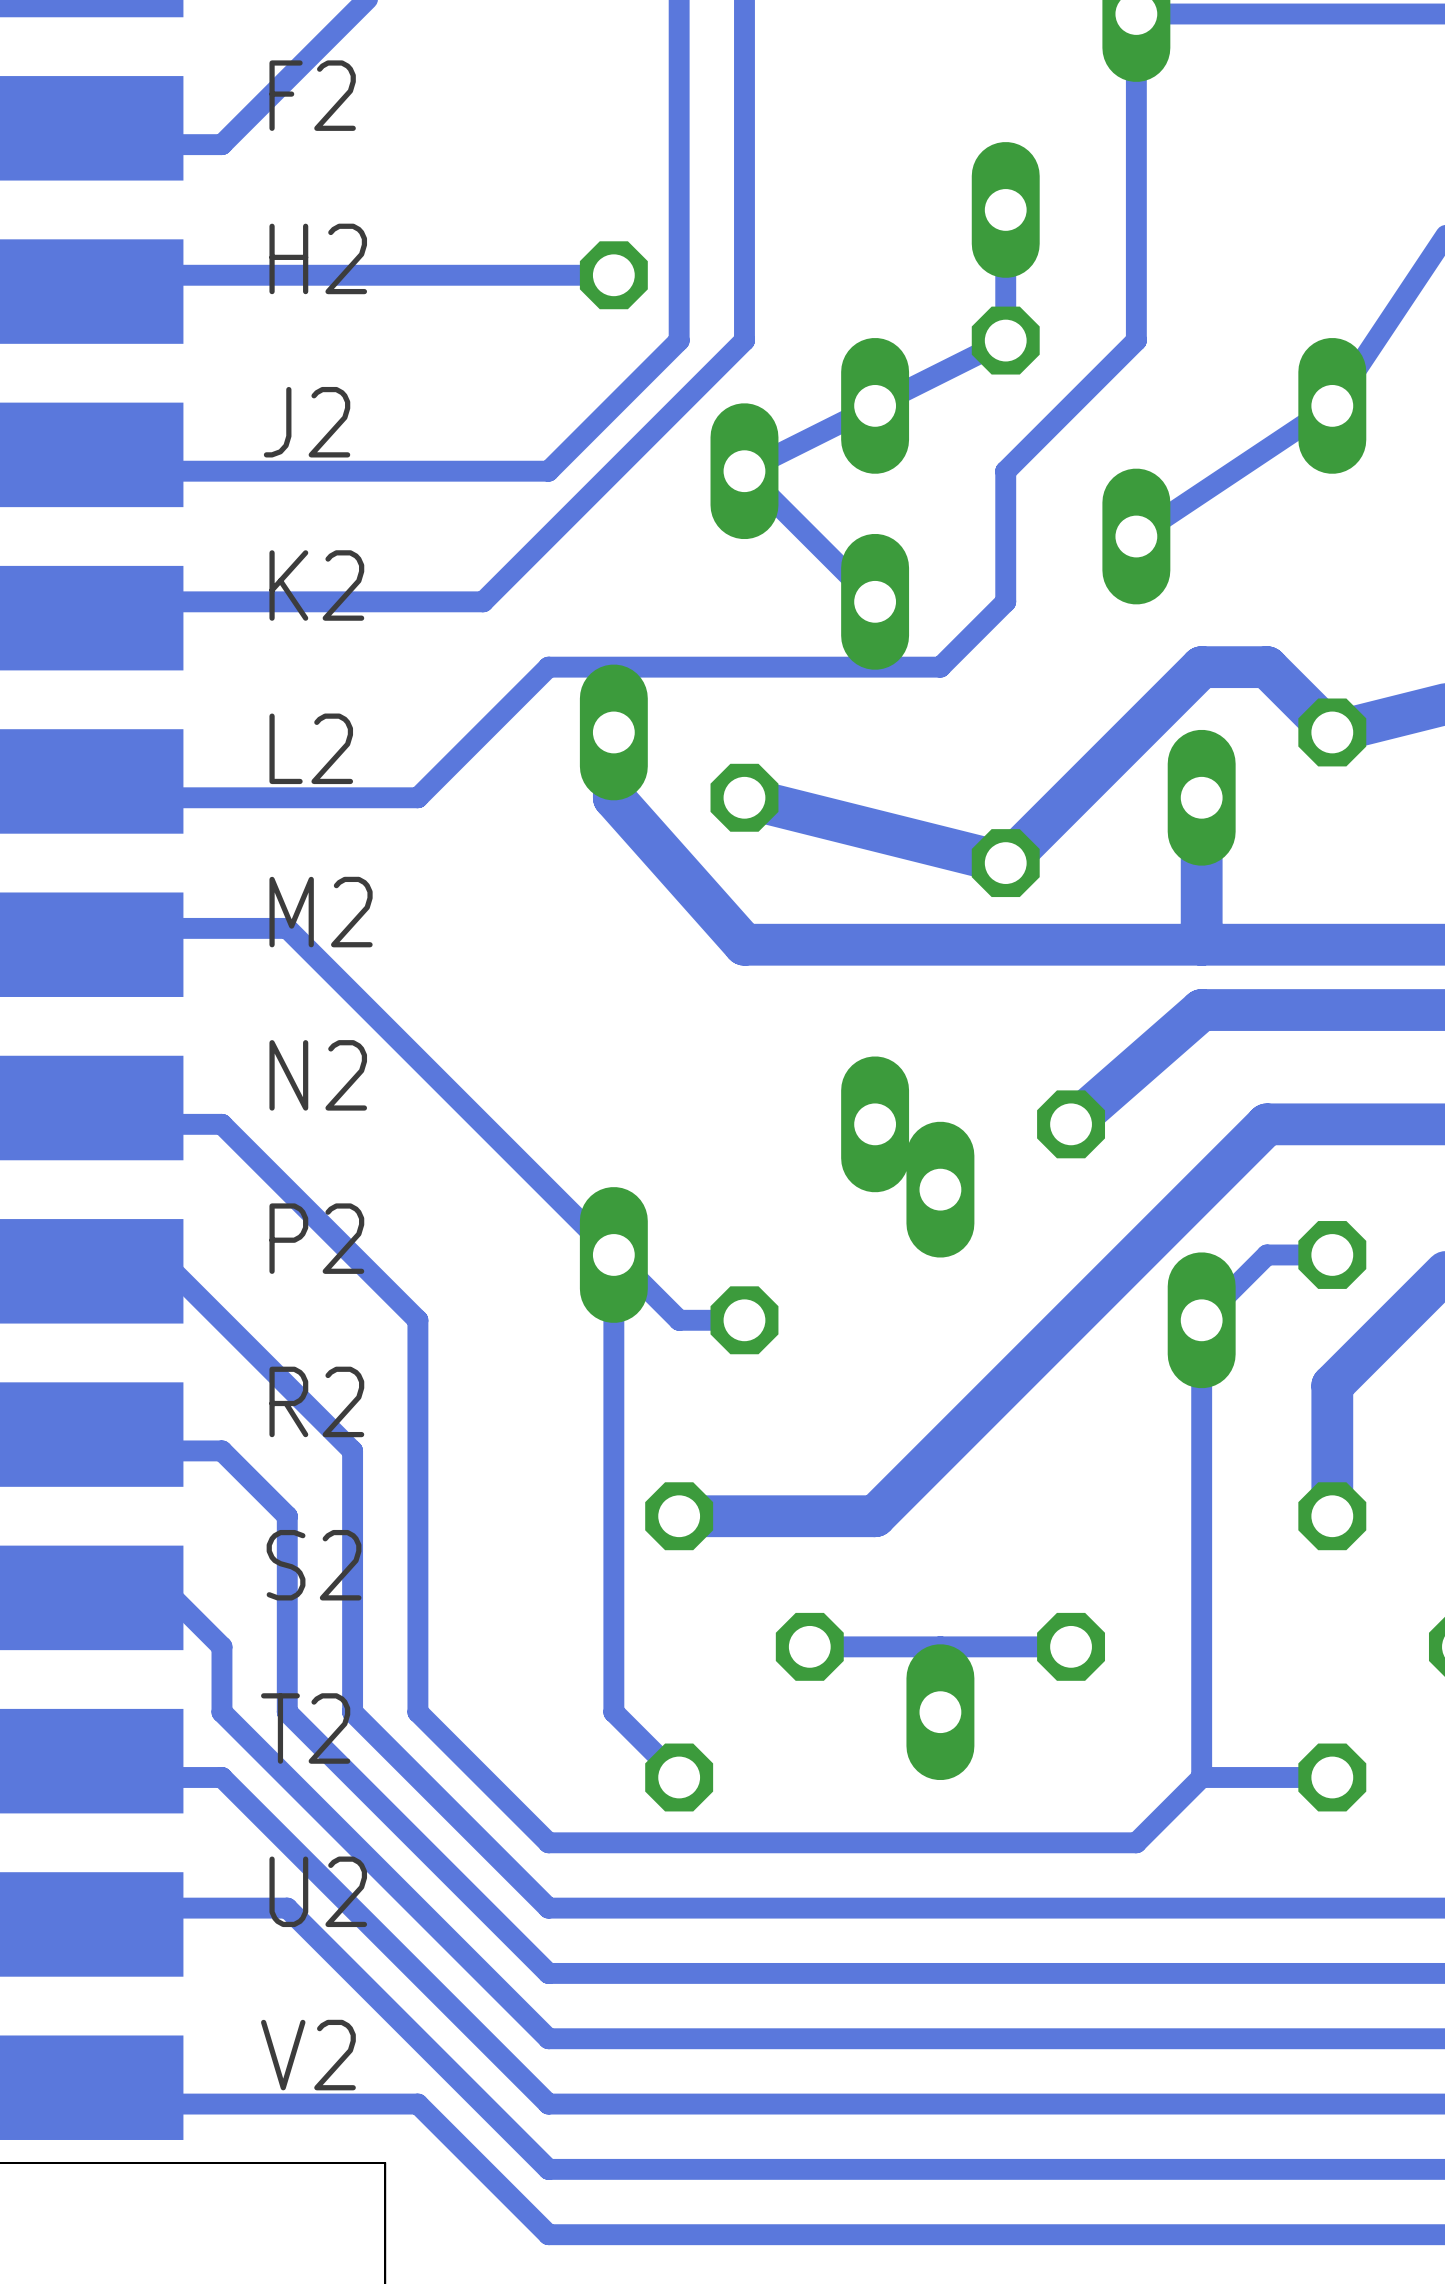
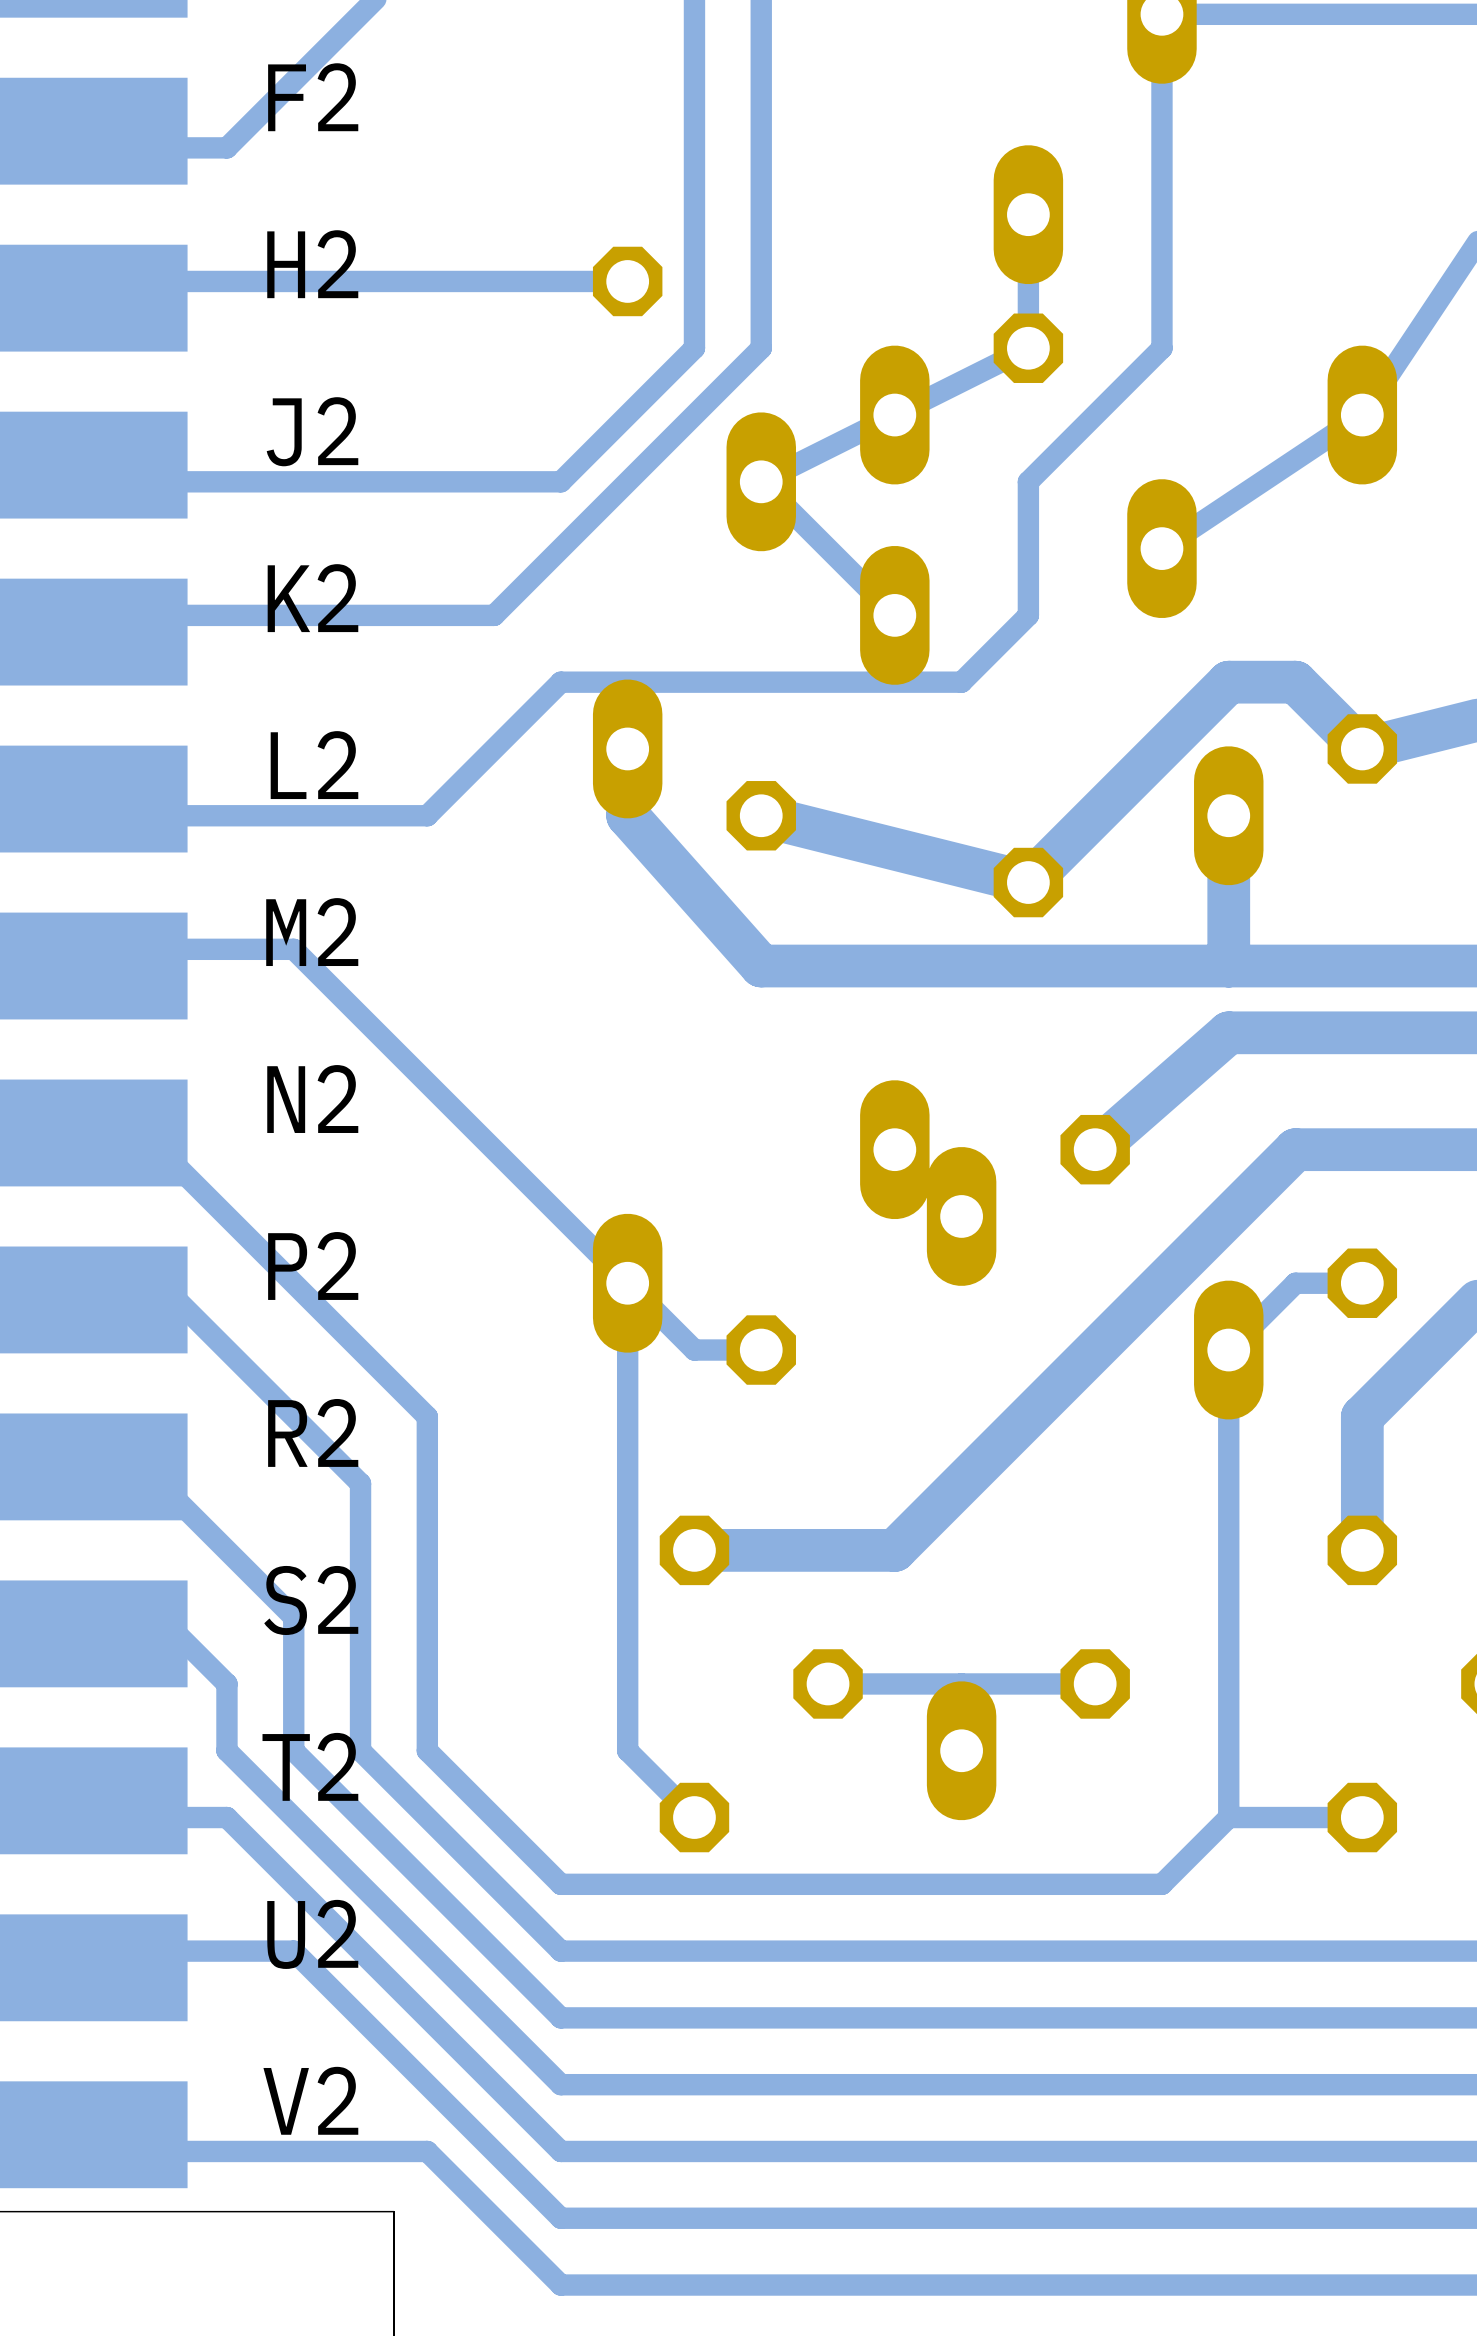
track: (156, 1124) (221, 1124) (417, 1320) (417, 1385) -> (160, 1149) (427, 1416)
track: (156, 1450) (221, 1450) (287, 1516) (287, 1581) -> (160, 1483) (293, 1617)

